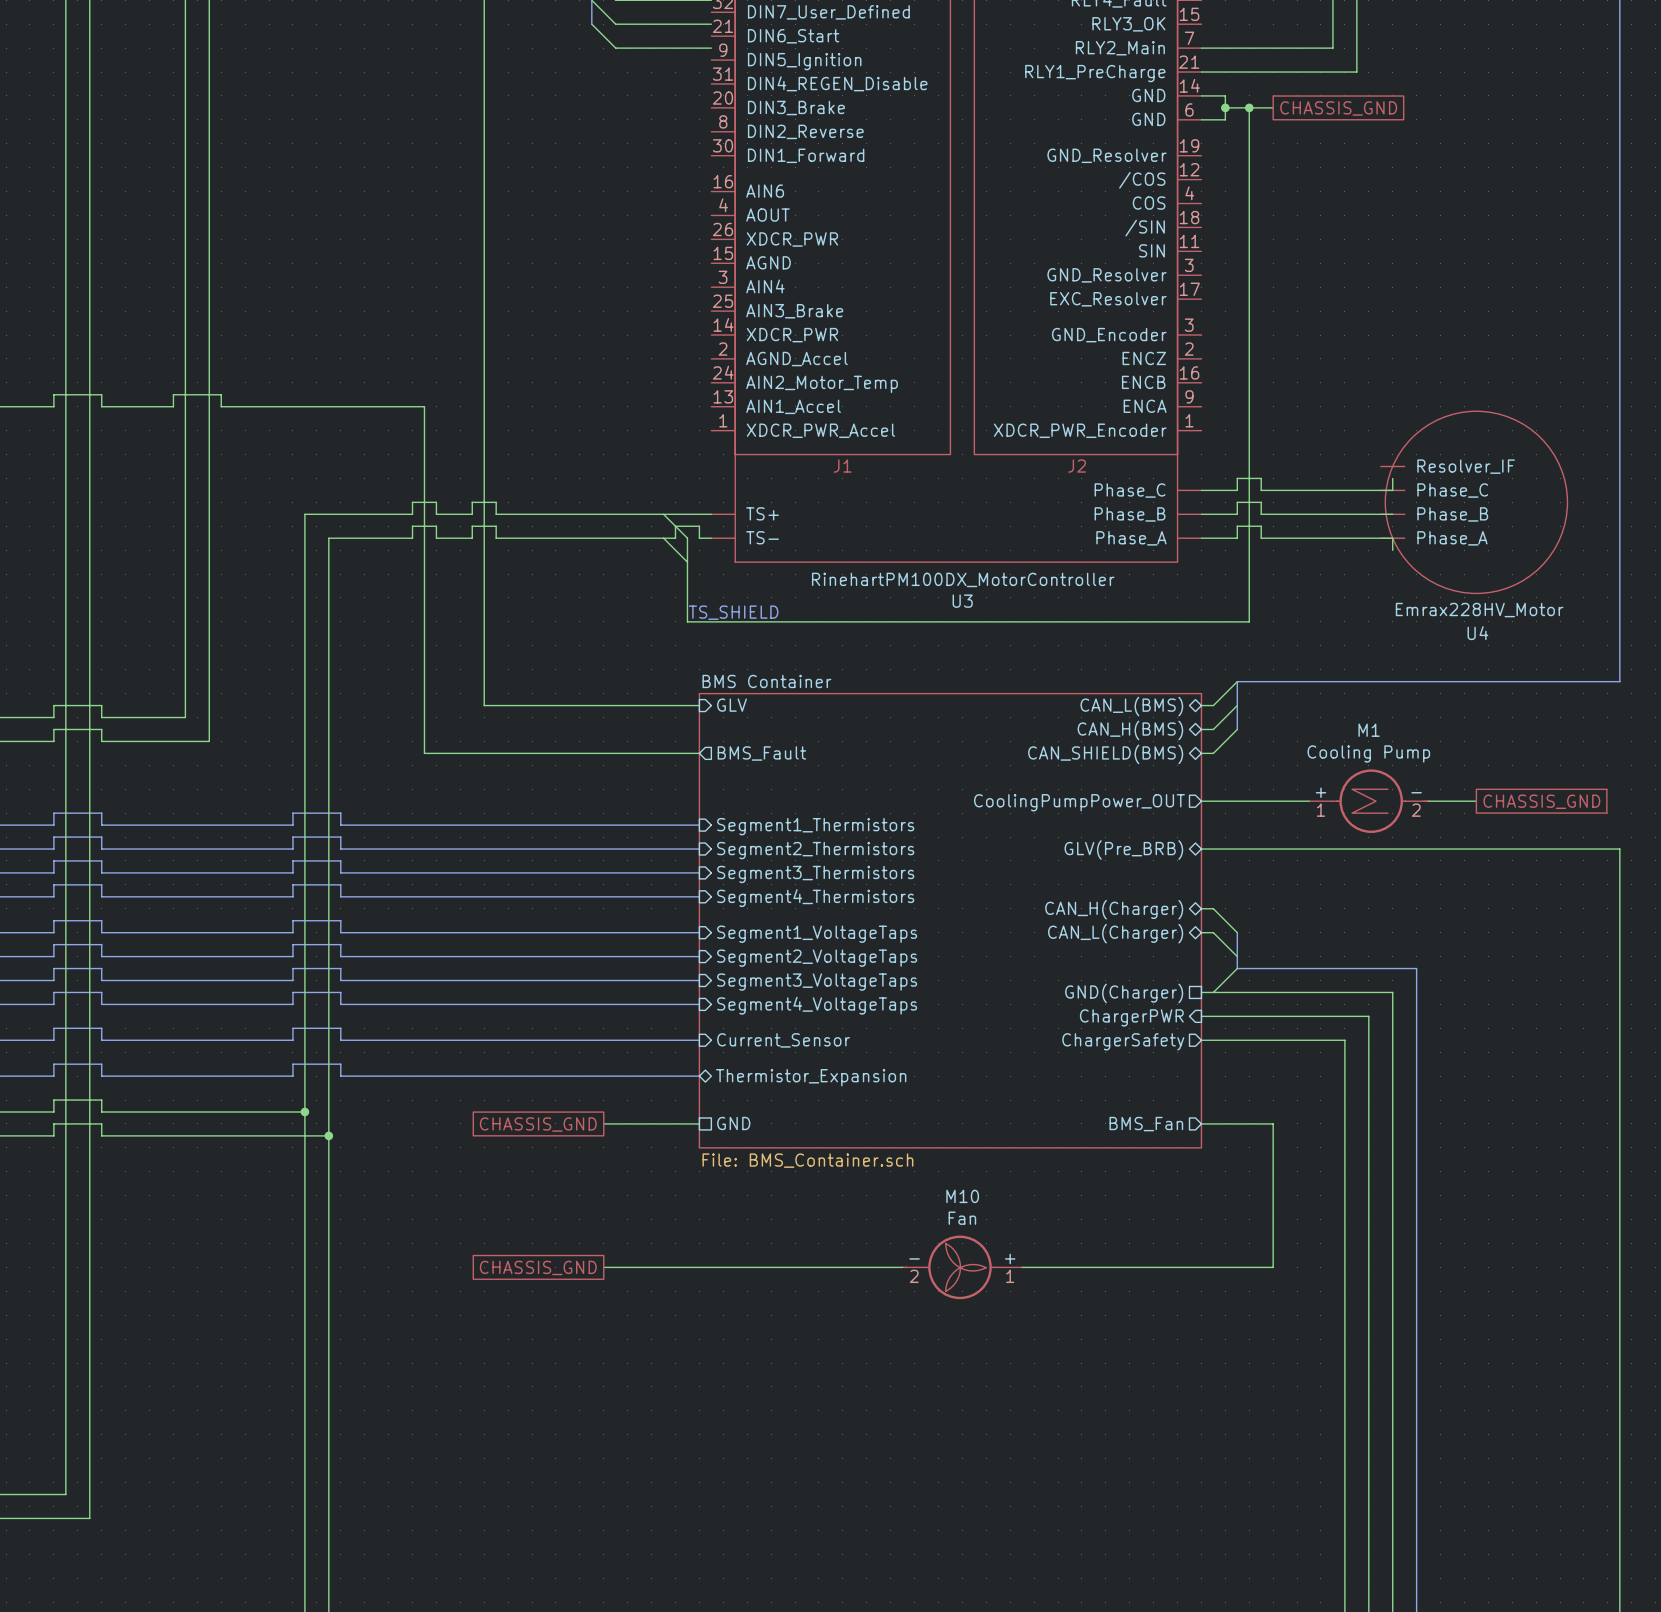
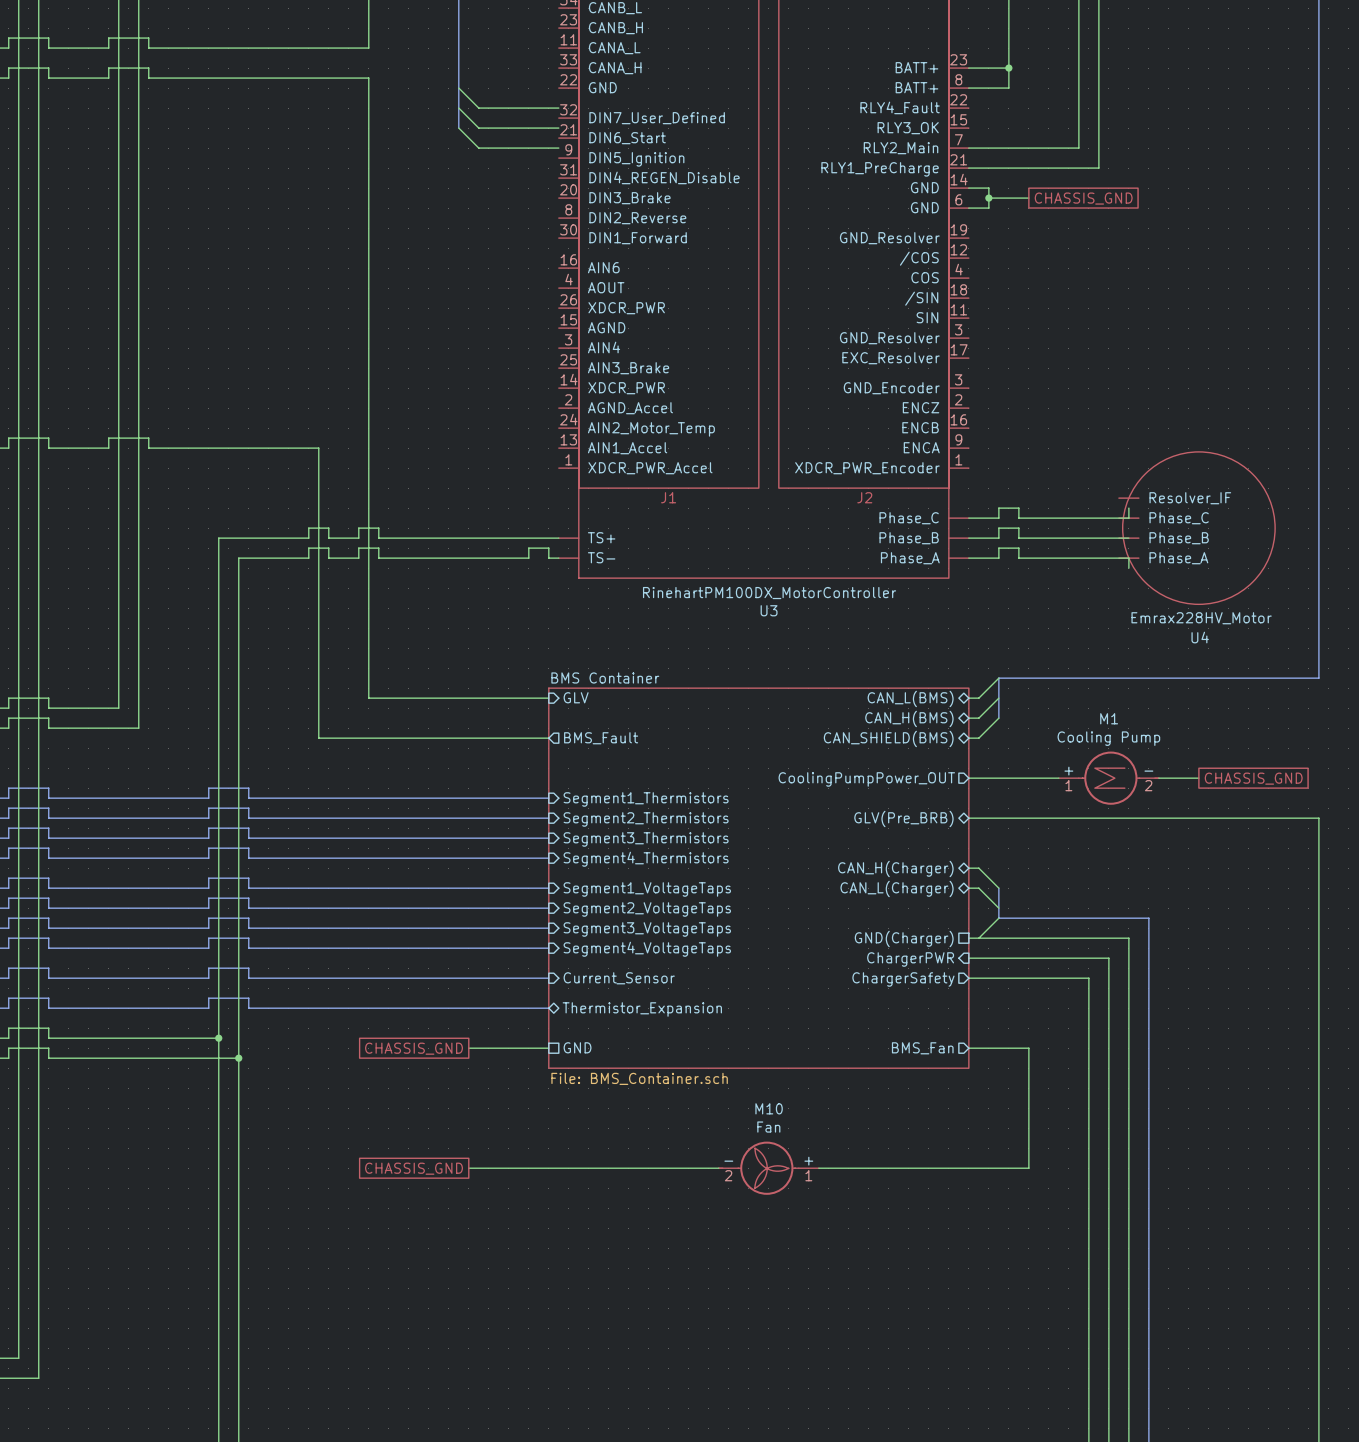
wire: (1249, 107) (1249, 621) (687, 621) (687, 538) (663, 514) -> none
junction: (1249, 107) -> none
wire: (663, 538) (687, 562) -> none
text: TS_SHIELD (733, 612) -> none

